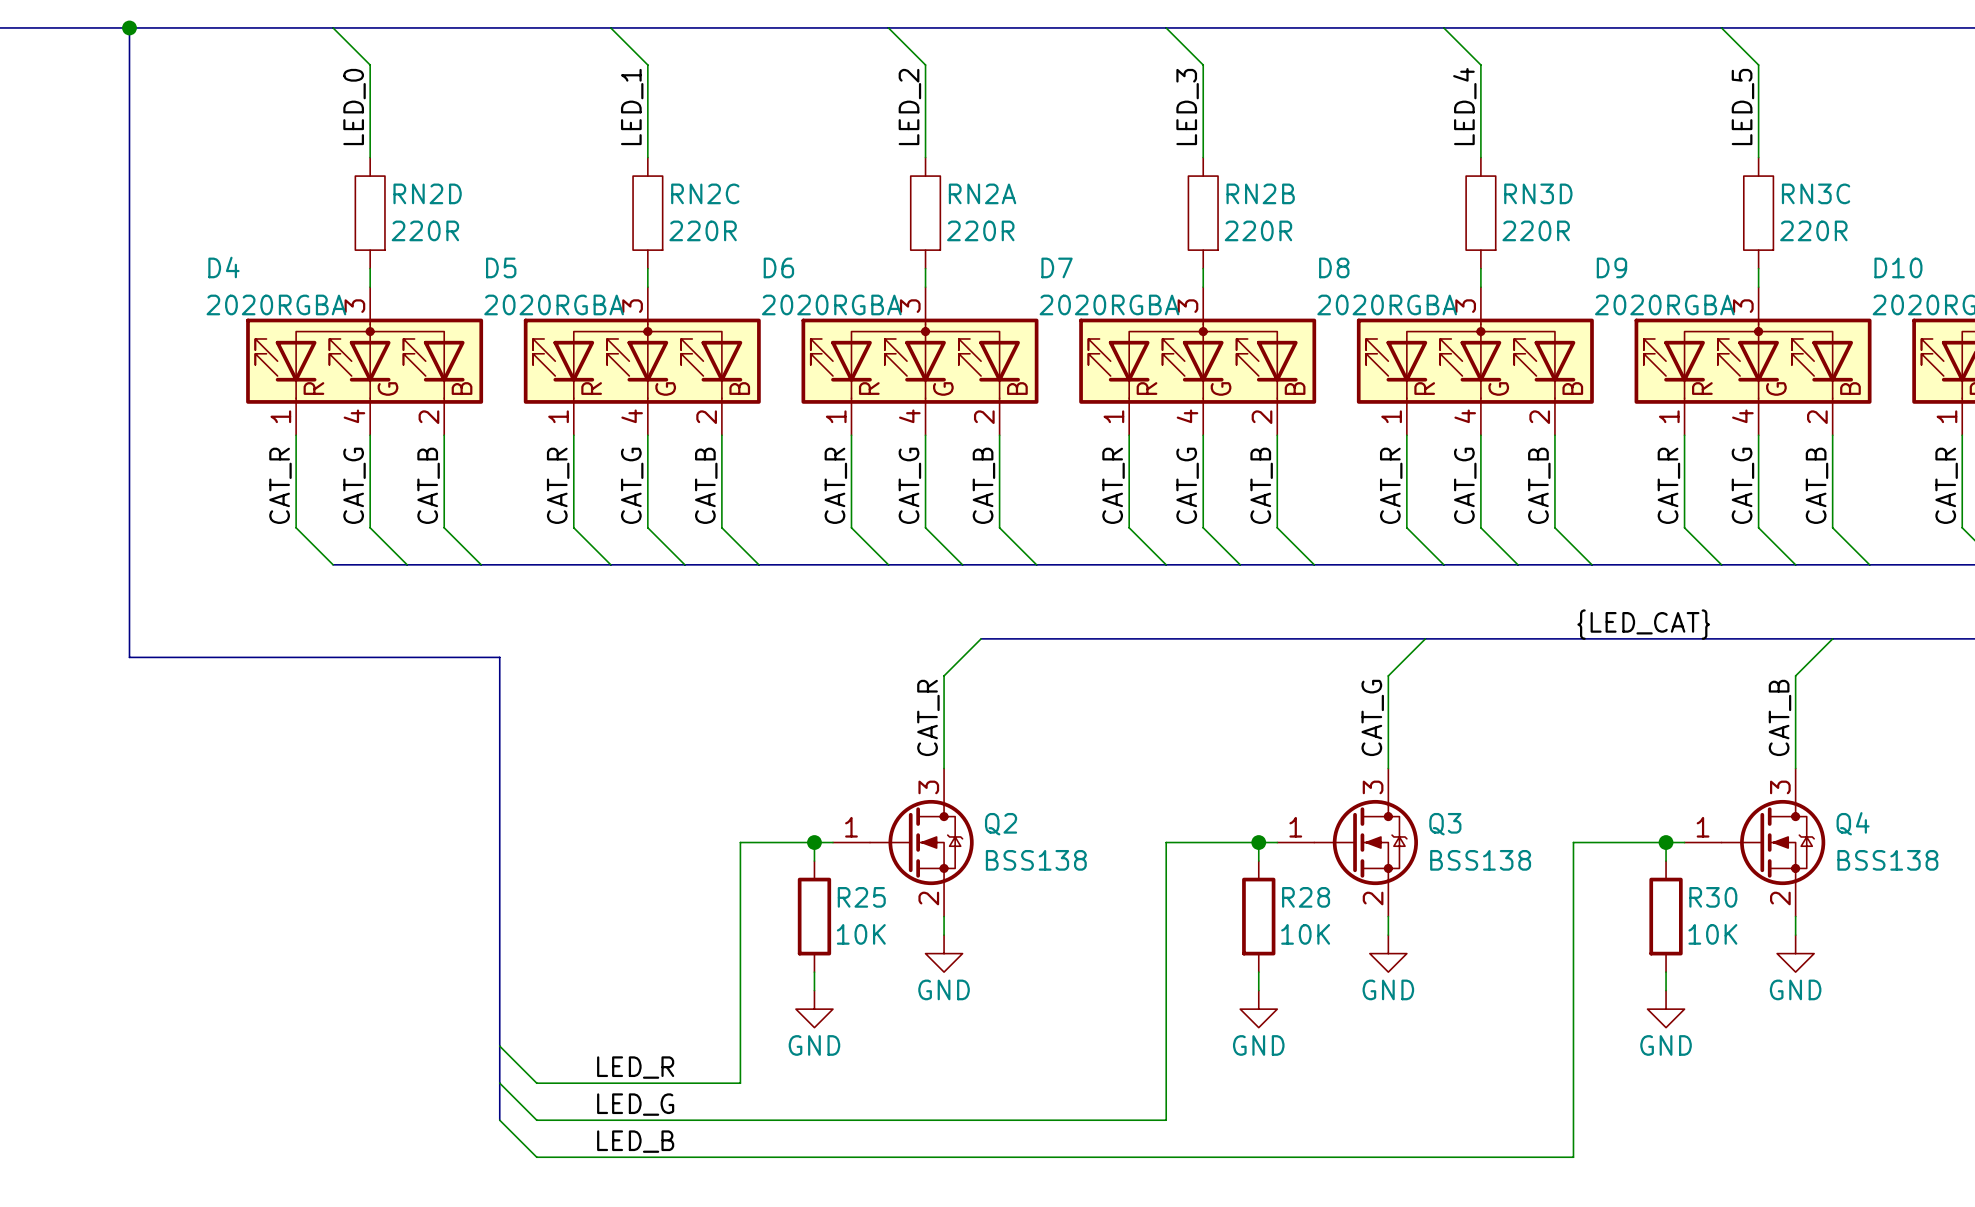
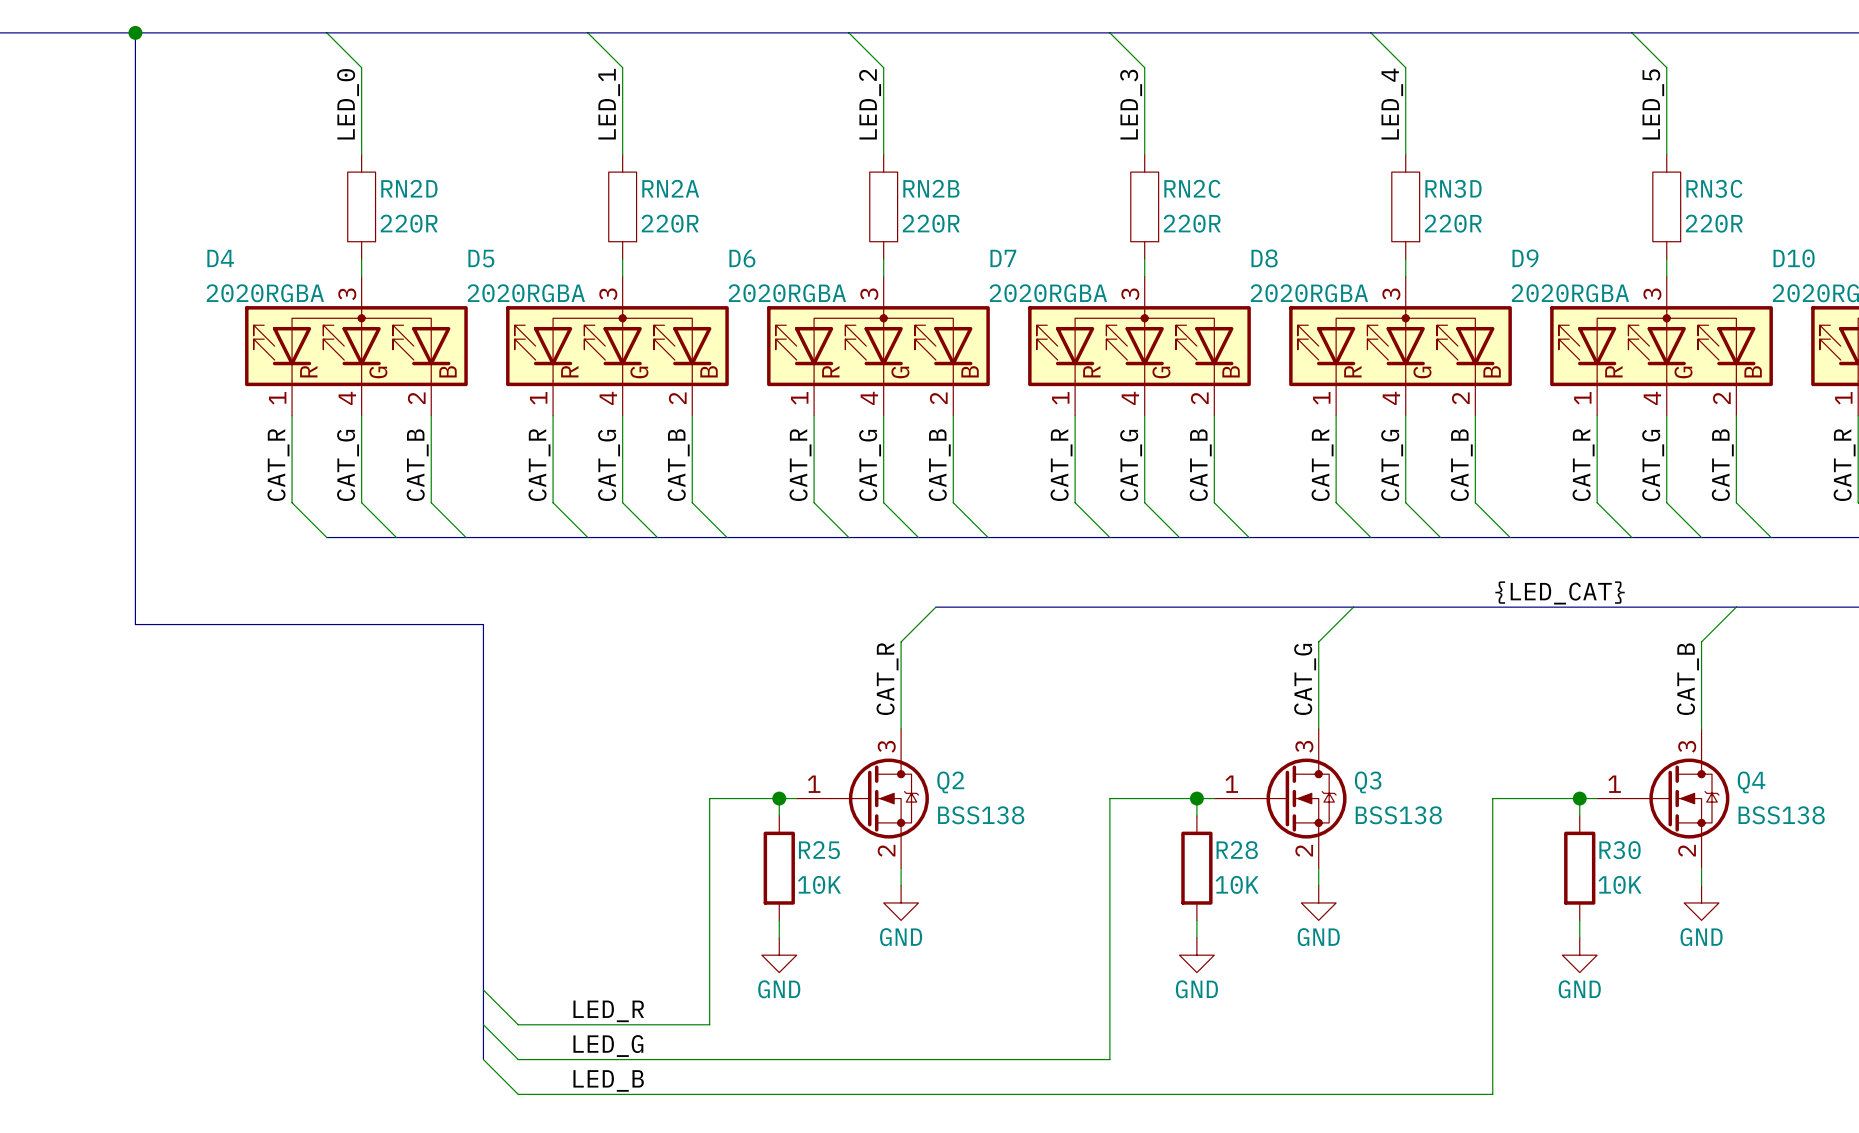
RN2C name: RN2C (705, 193) -> RN2A (670, 188)
RN2A name: RN2A (982, 193) -> RN2B (931, 188)
RN2B name: RN2B (1260, 193) -> RN2C (1192, 188)

